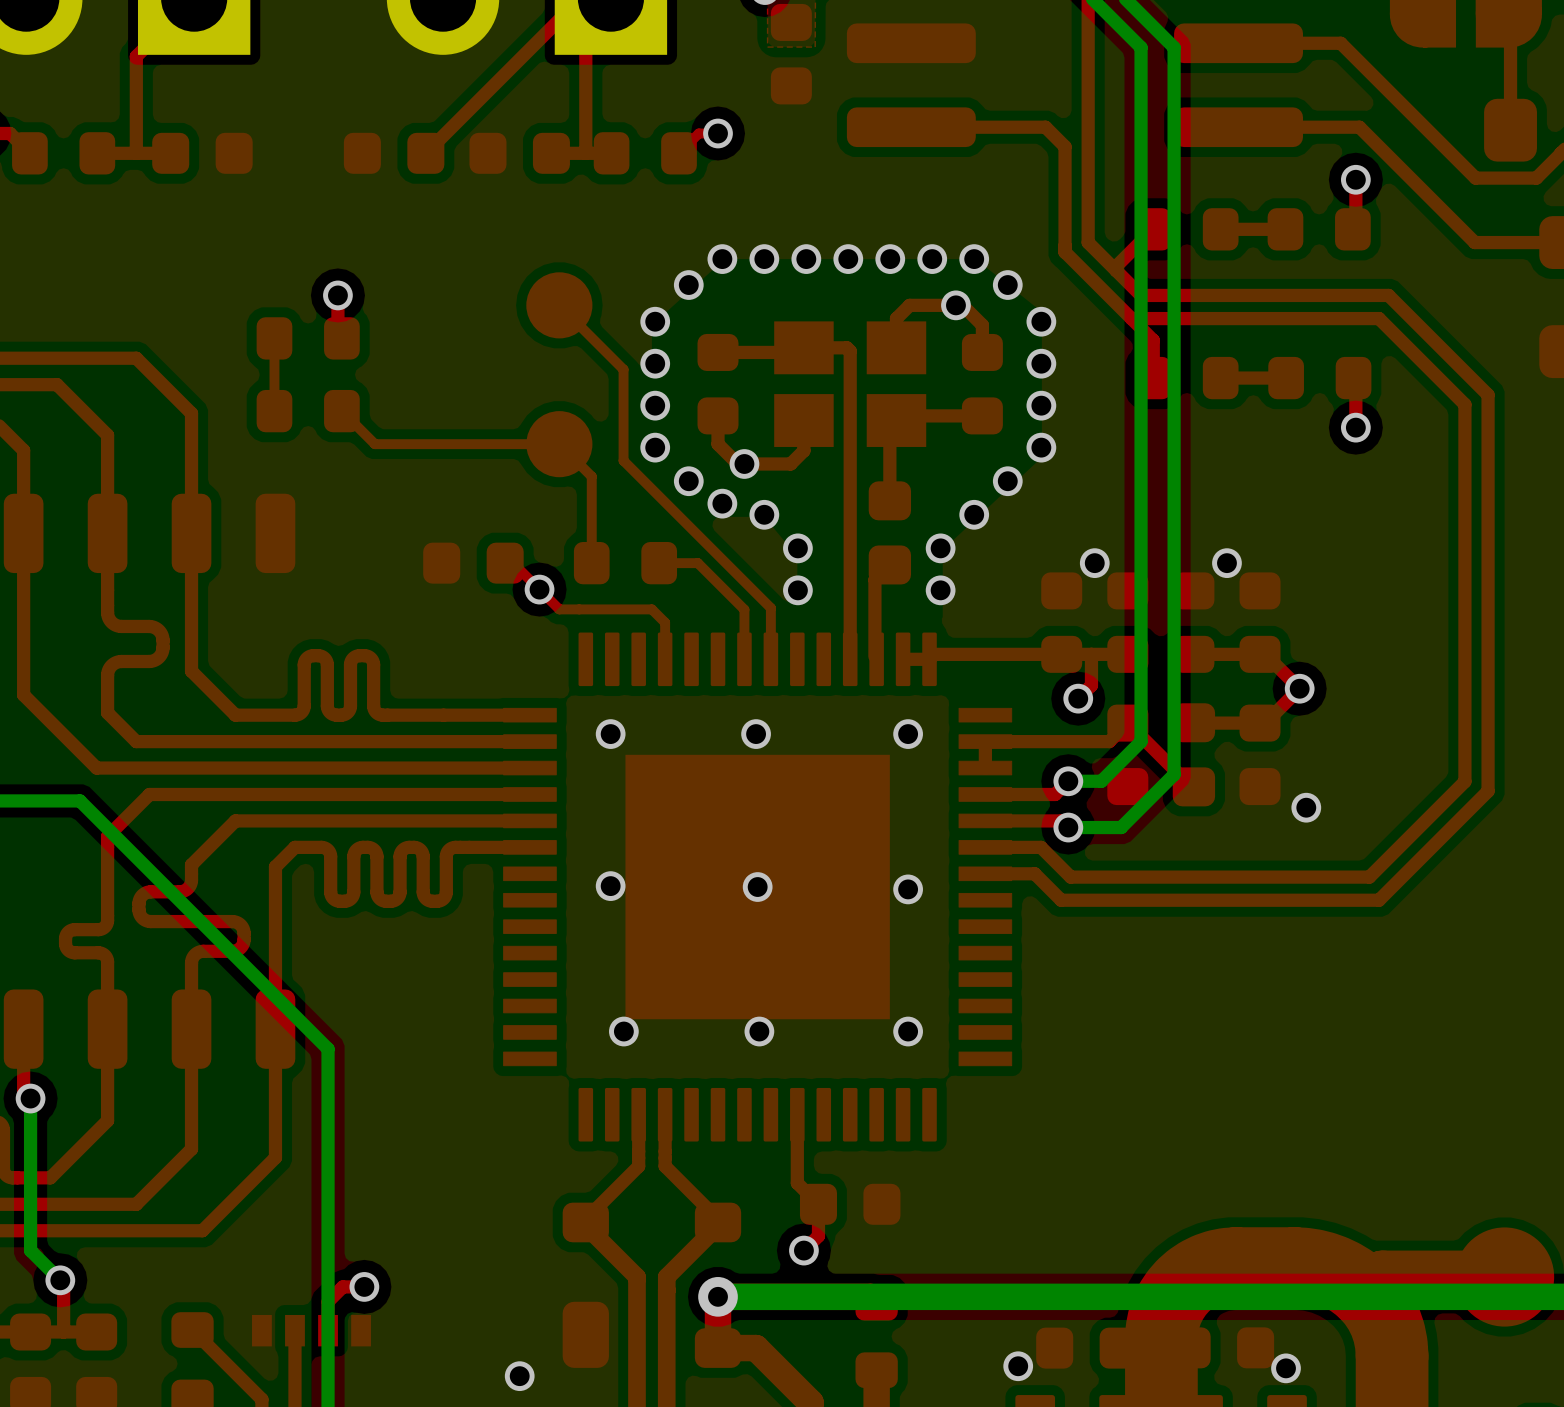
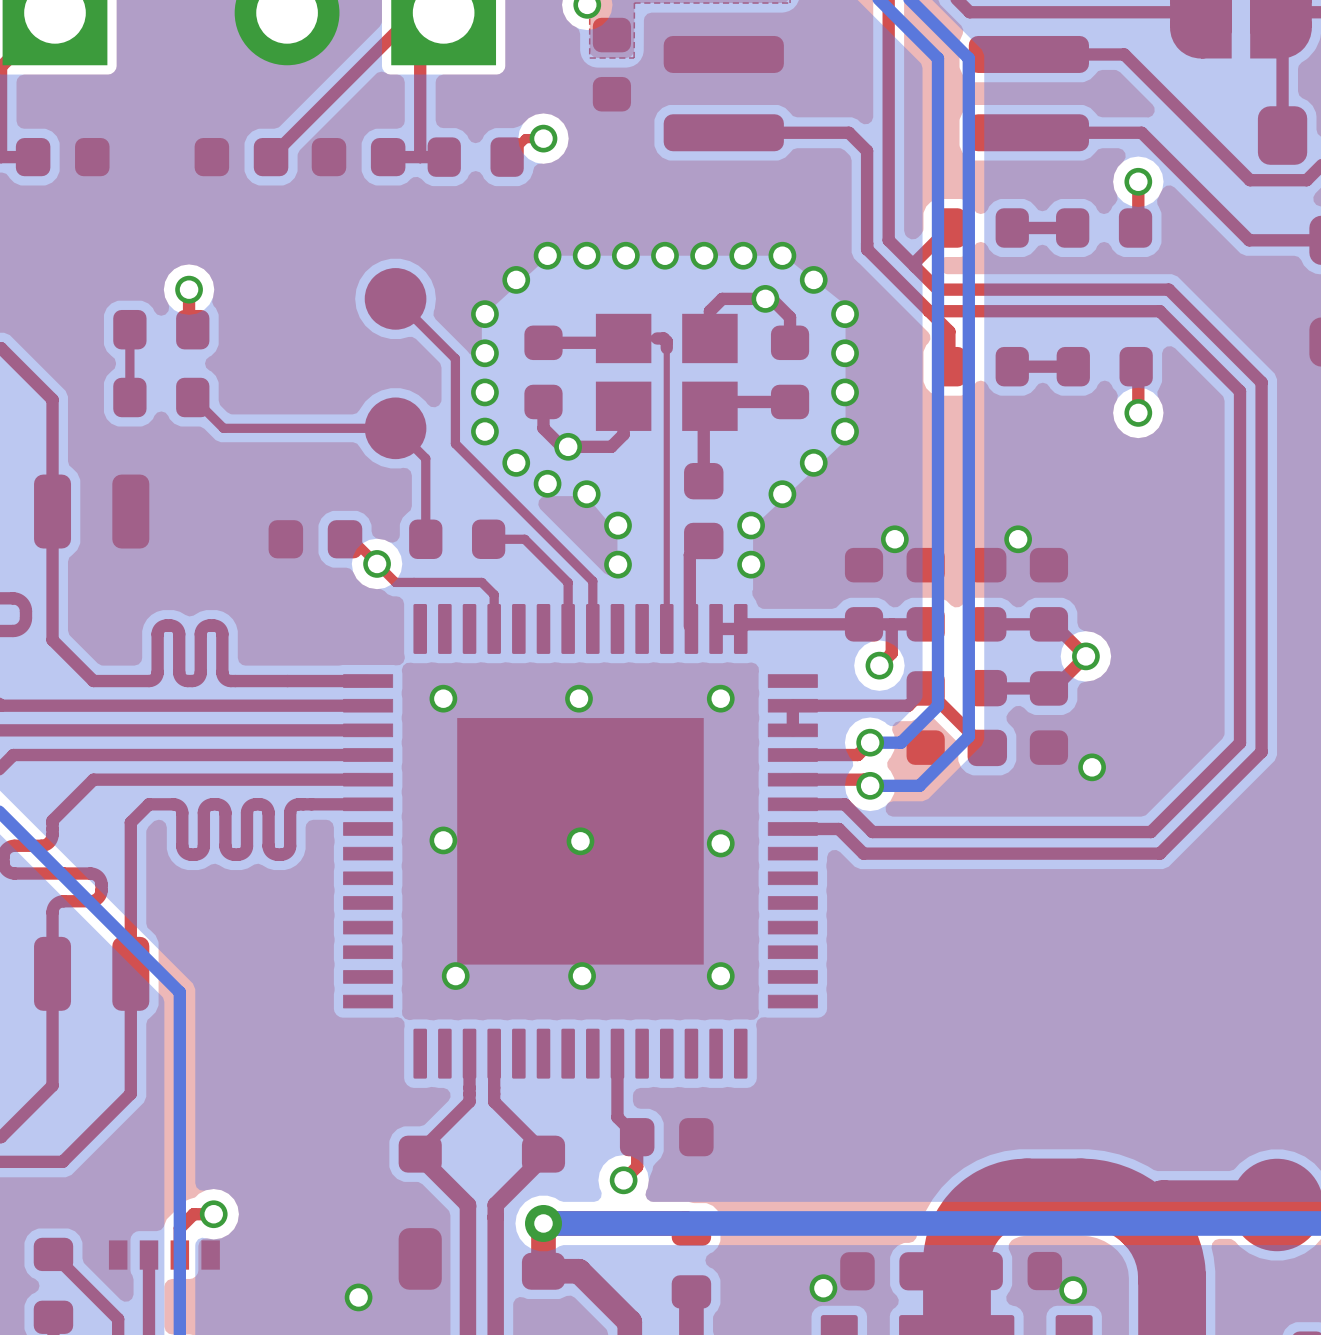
top track width: thick (850, 358) (850, 654) -> thin (666, 348) (666, 624)

